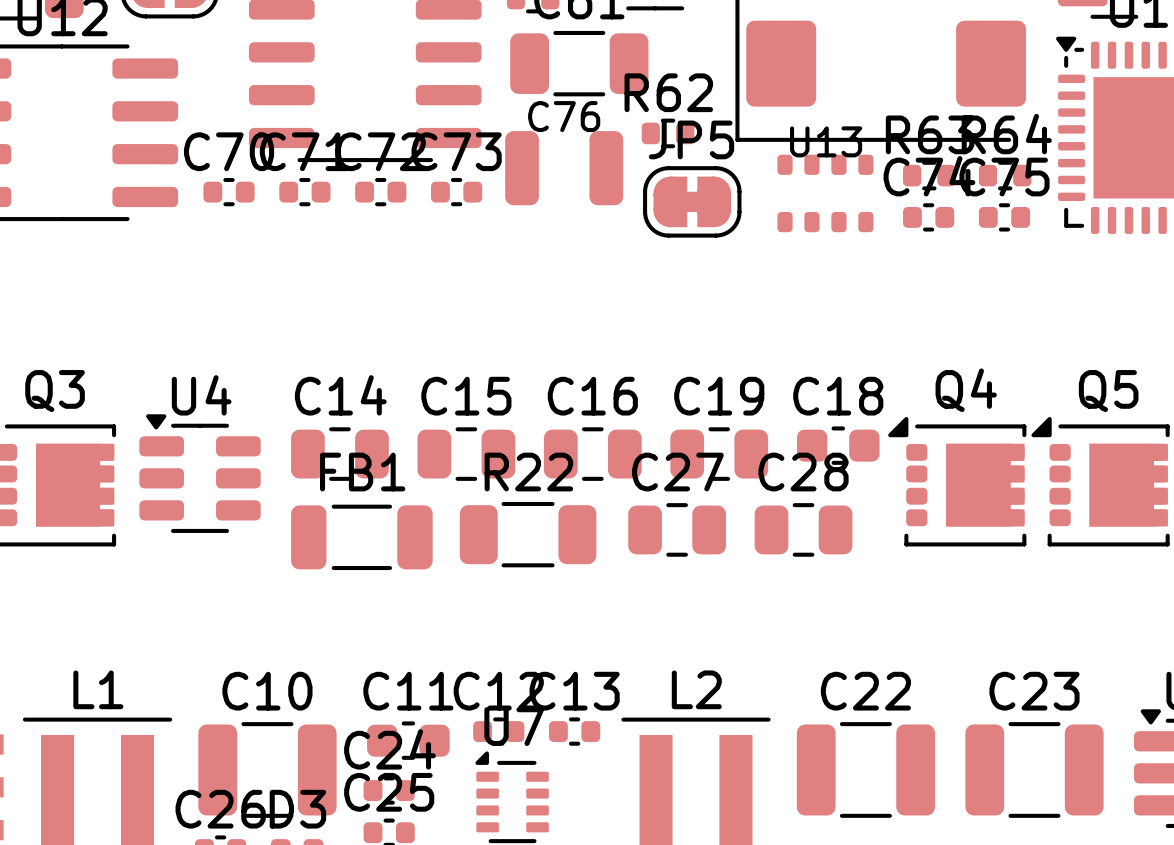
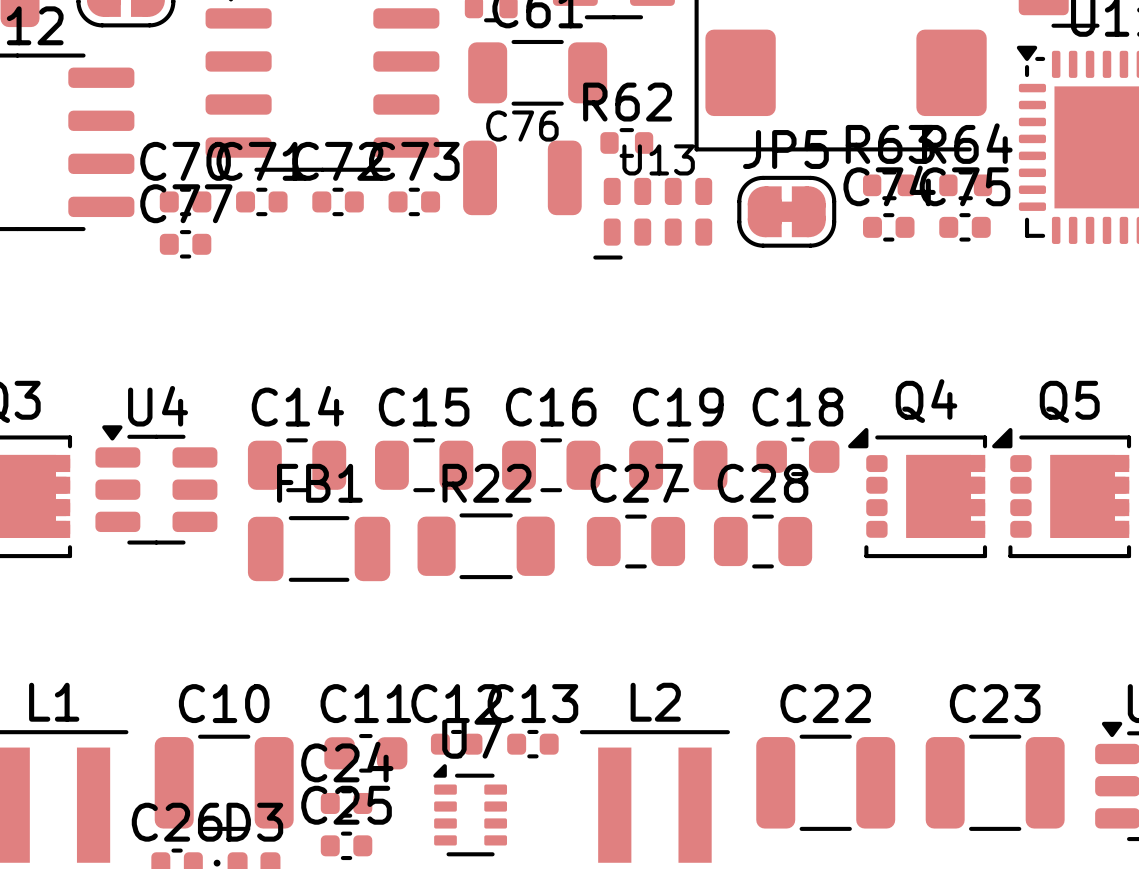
U13 footprint: [777, 154, 874, 233] -> [593, 177, 713, 260]
JP5 position: (692, 201) -> (786, 211)
C77: none -> (185, 244)

